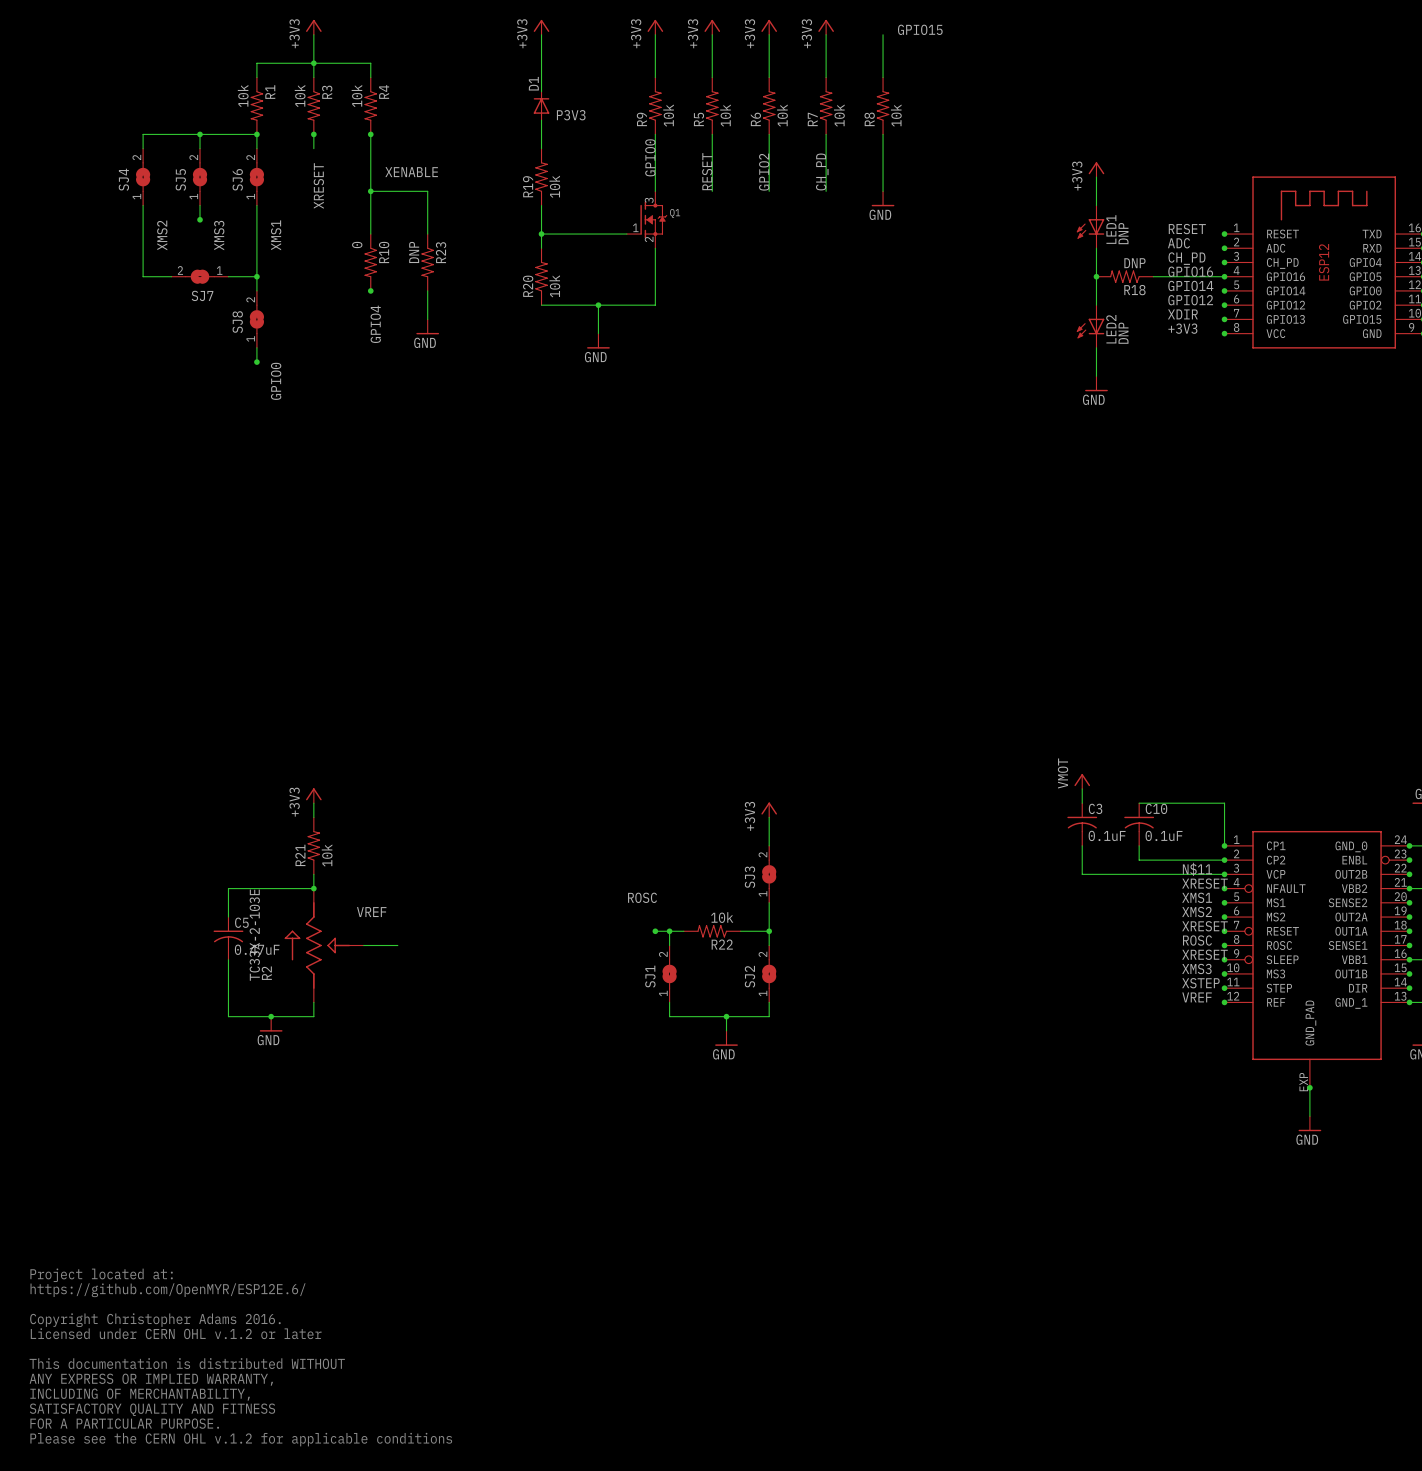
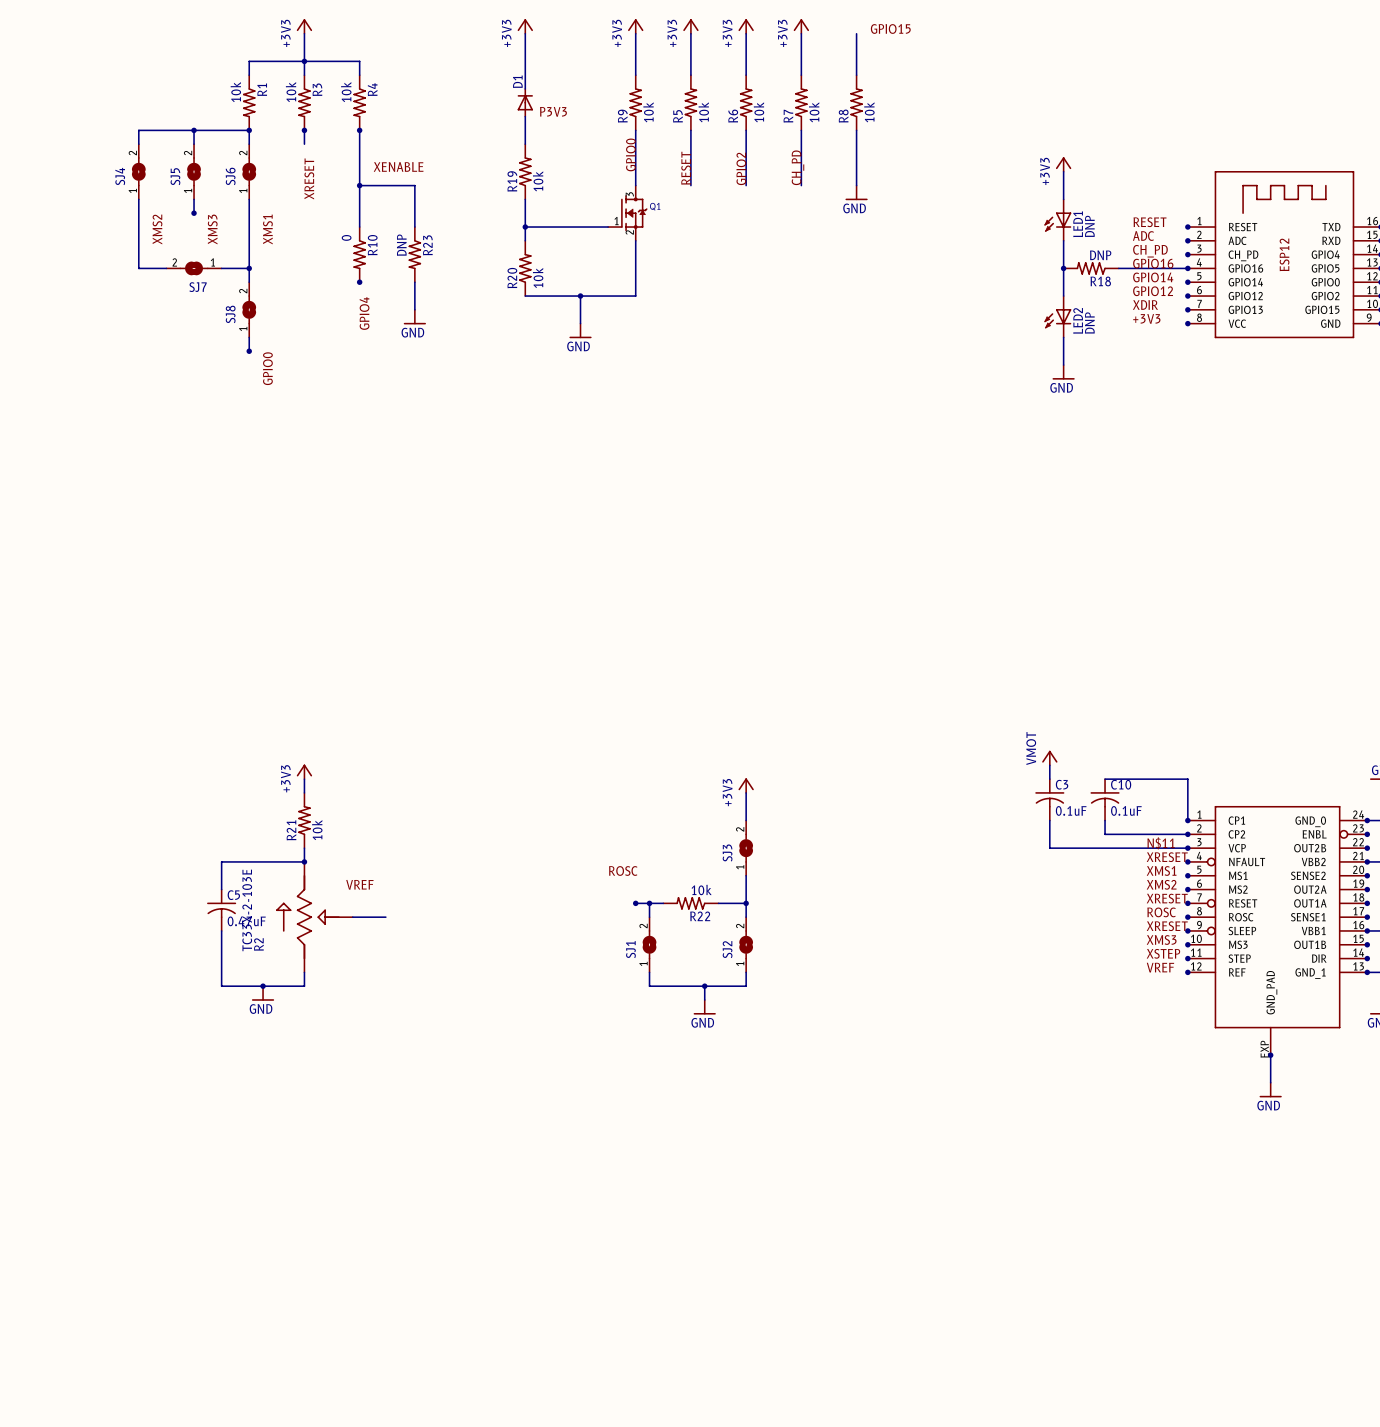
text: Project located at: (101, 1275) -> none
text: https://github.com/OpenMYR/ESP12E.6/ (168, 1290) -> none
text: Copyright Christopher Adams 2016. (155, 1320) -> none
text: Licensed under CERN OHL v.1.2 or later (176, 1333) -> none
text: This documentation is distributed WITHOUT (187, 1363) -> none
text: ANY EXPRESS OR IMPLIED WARRANTY, (151, 1379) -> none
text: INCLUDING OF MERCHANTABILITY, (140, 1394) -> none
text: SATISFACTORY QUALITY AND FITNESS (152, 1409) -> none
text: FOR A PARTICULAR PURPOSE. (124, 1423) -> none
text: Please see the CERN OHL v.1.2 for applicable conditions (241, 1439) -> none

